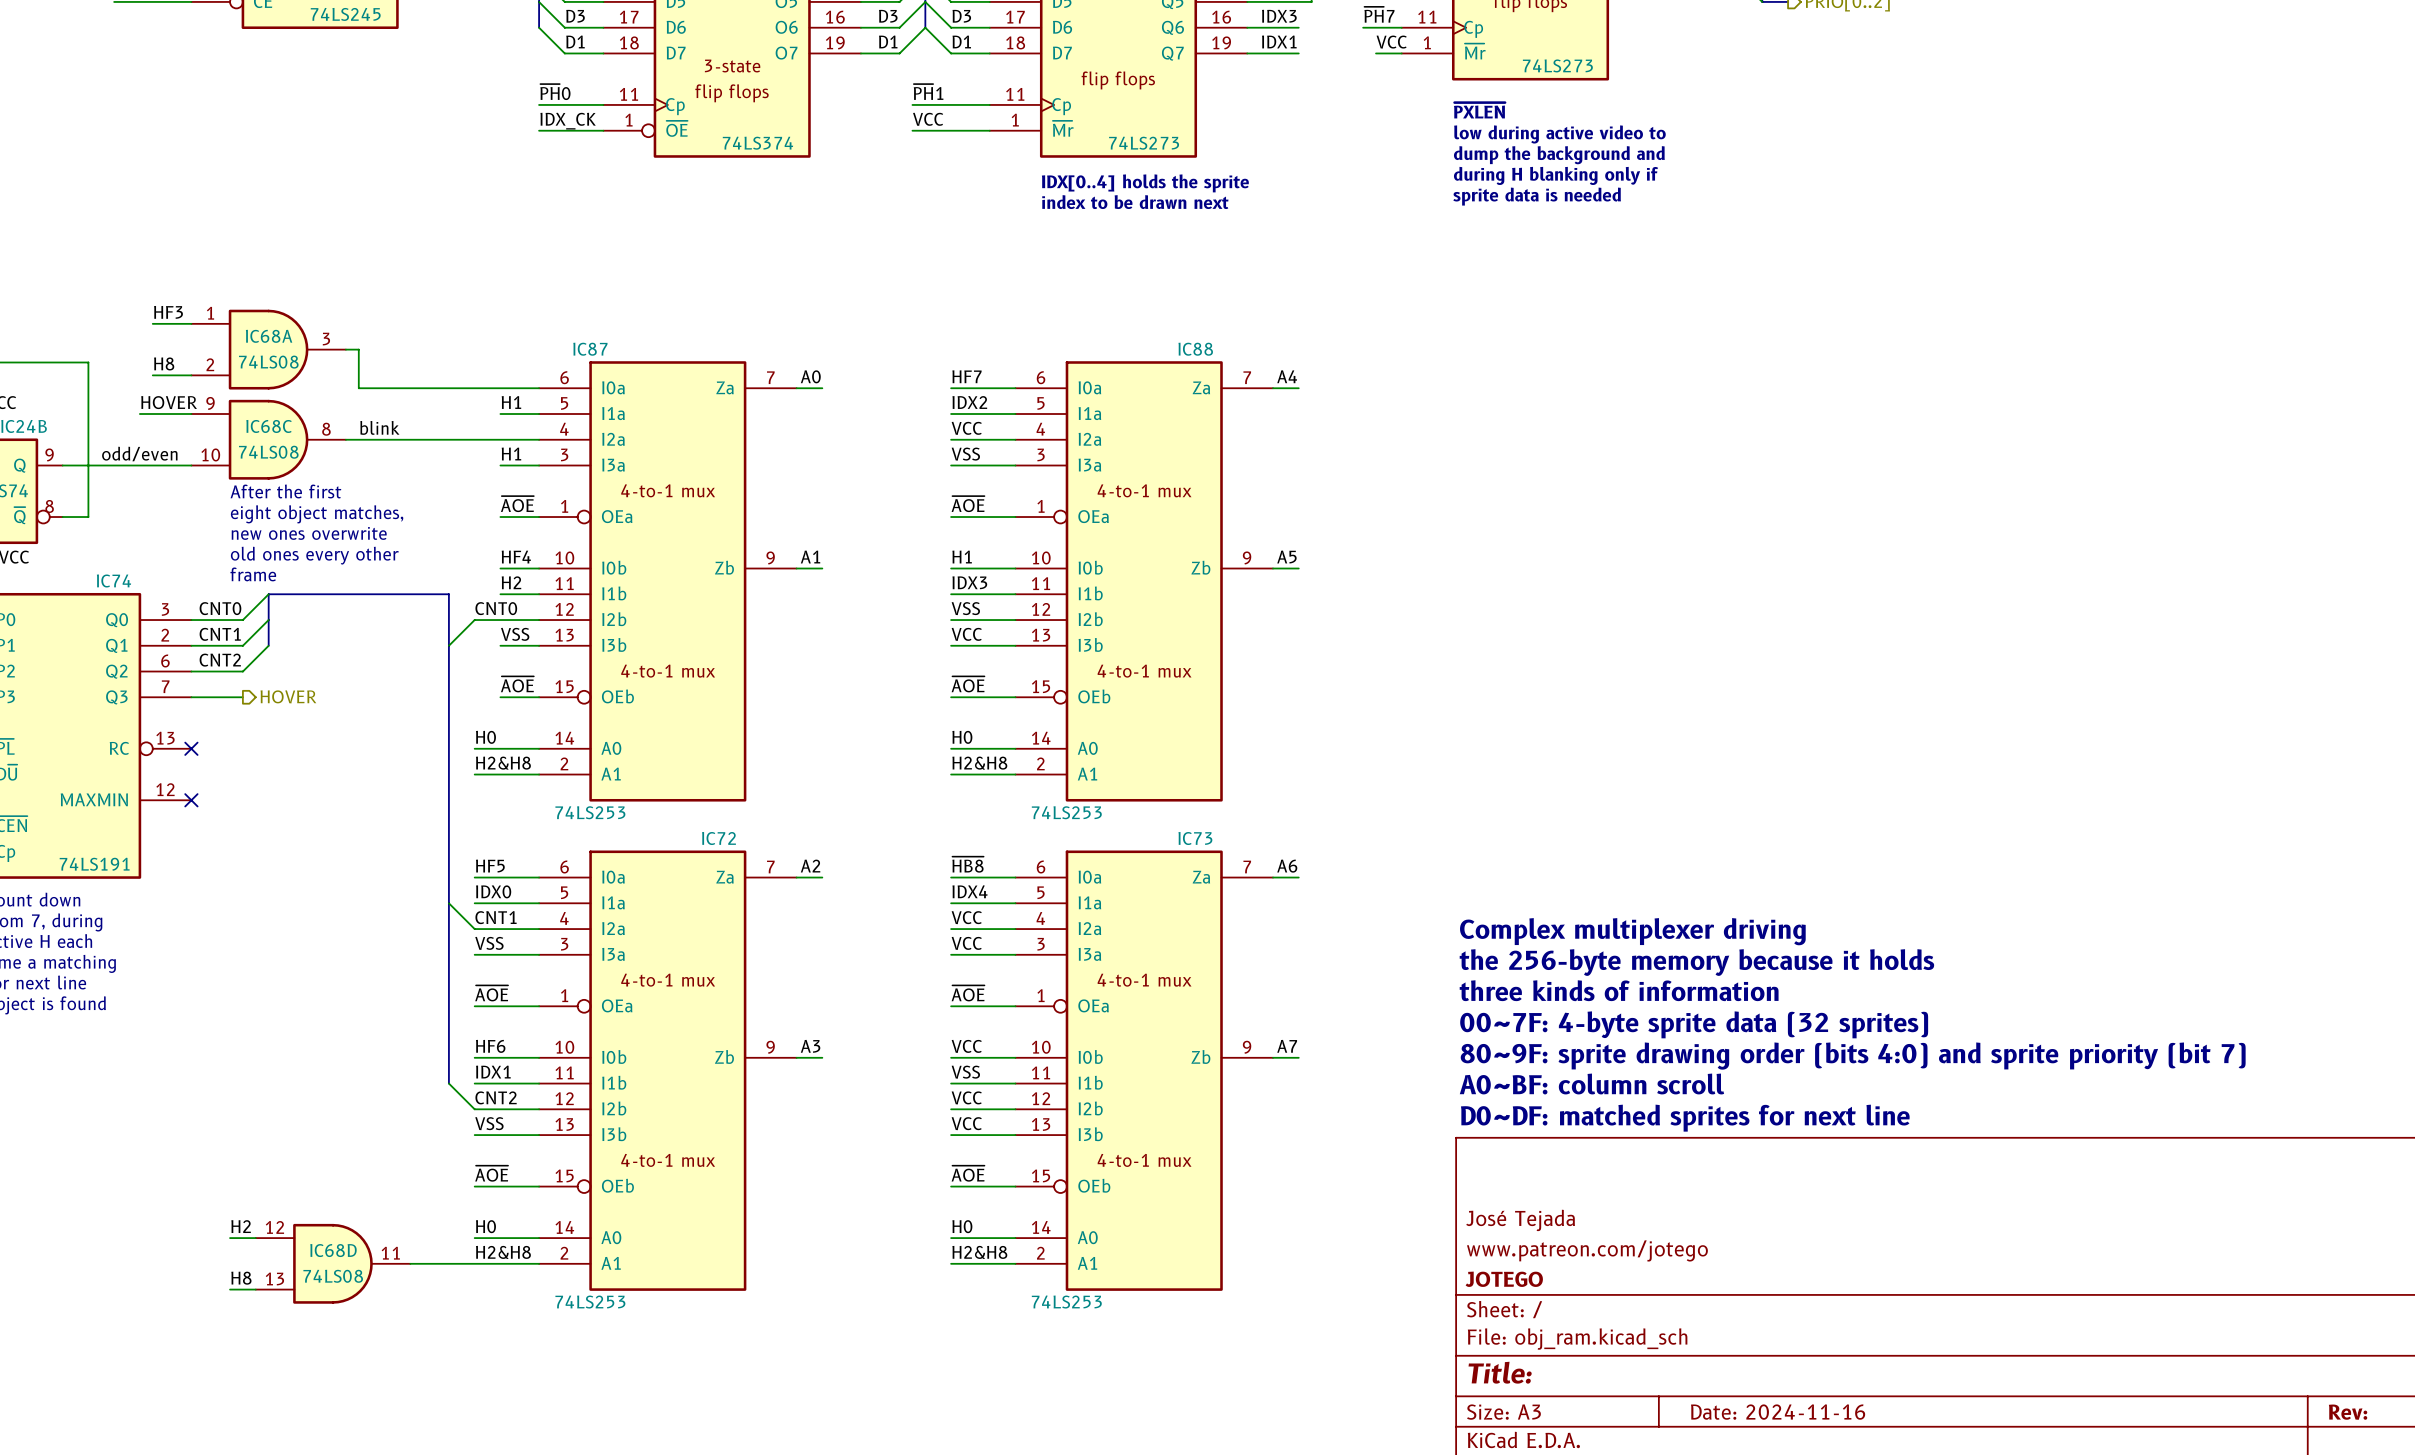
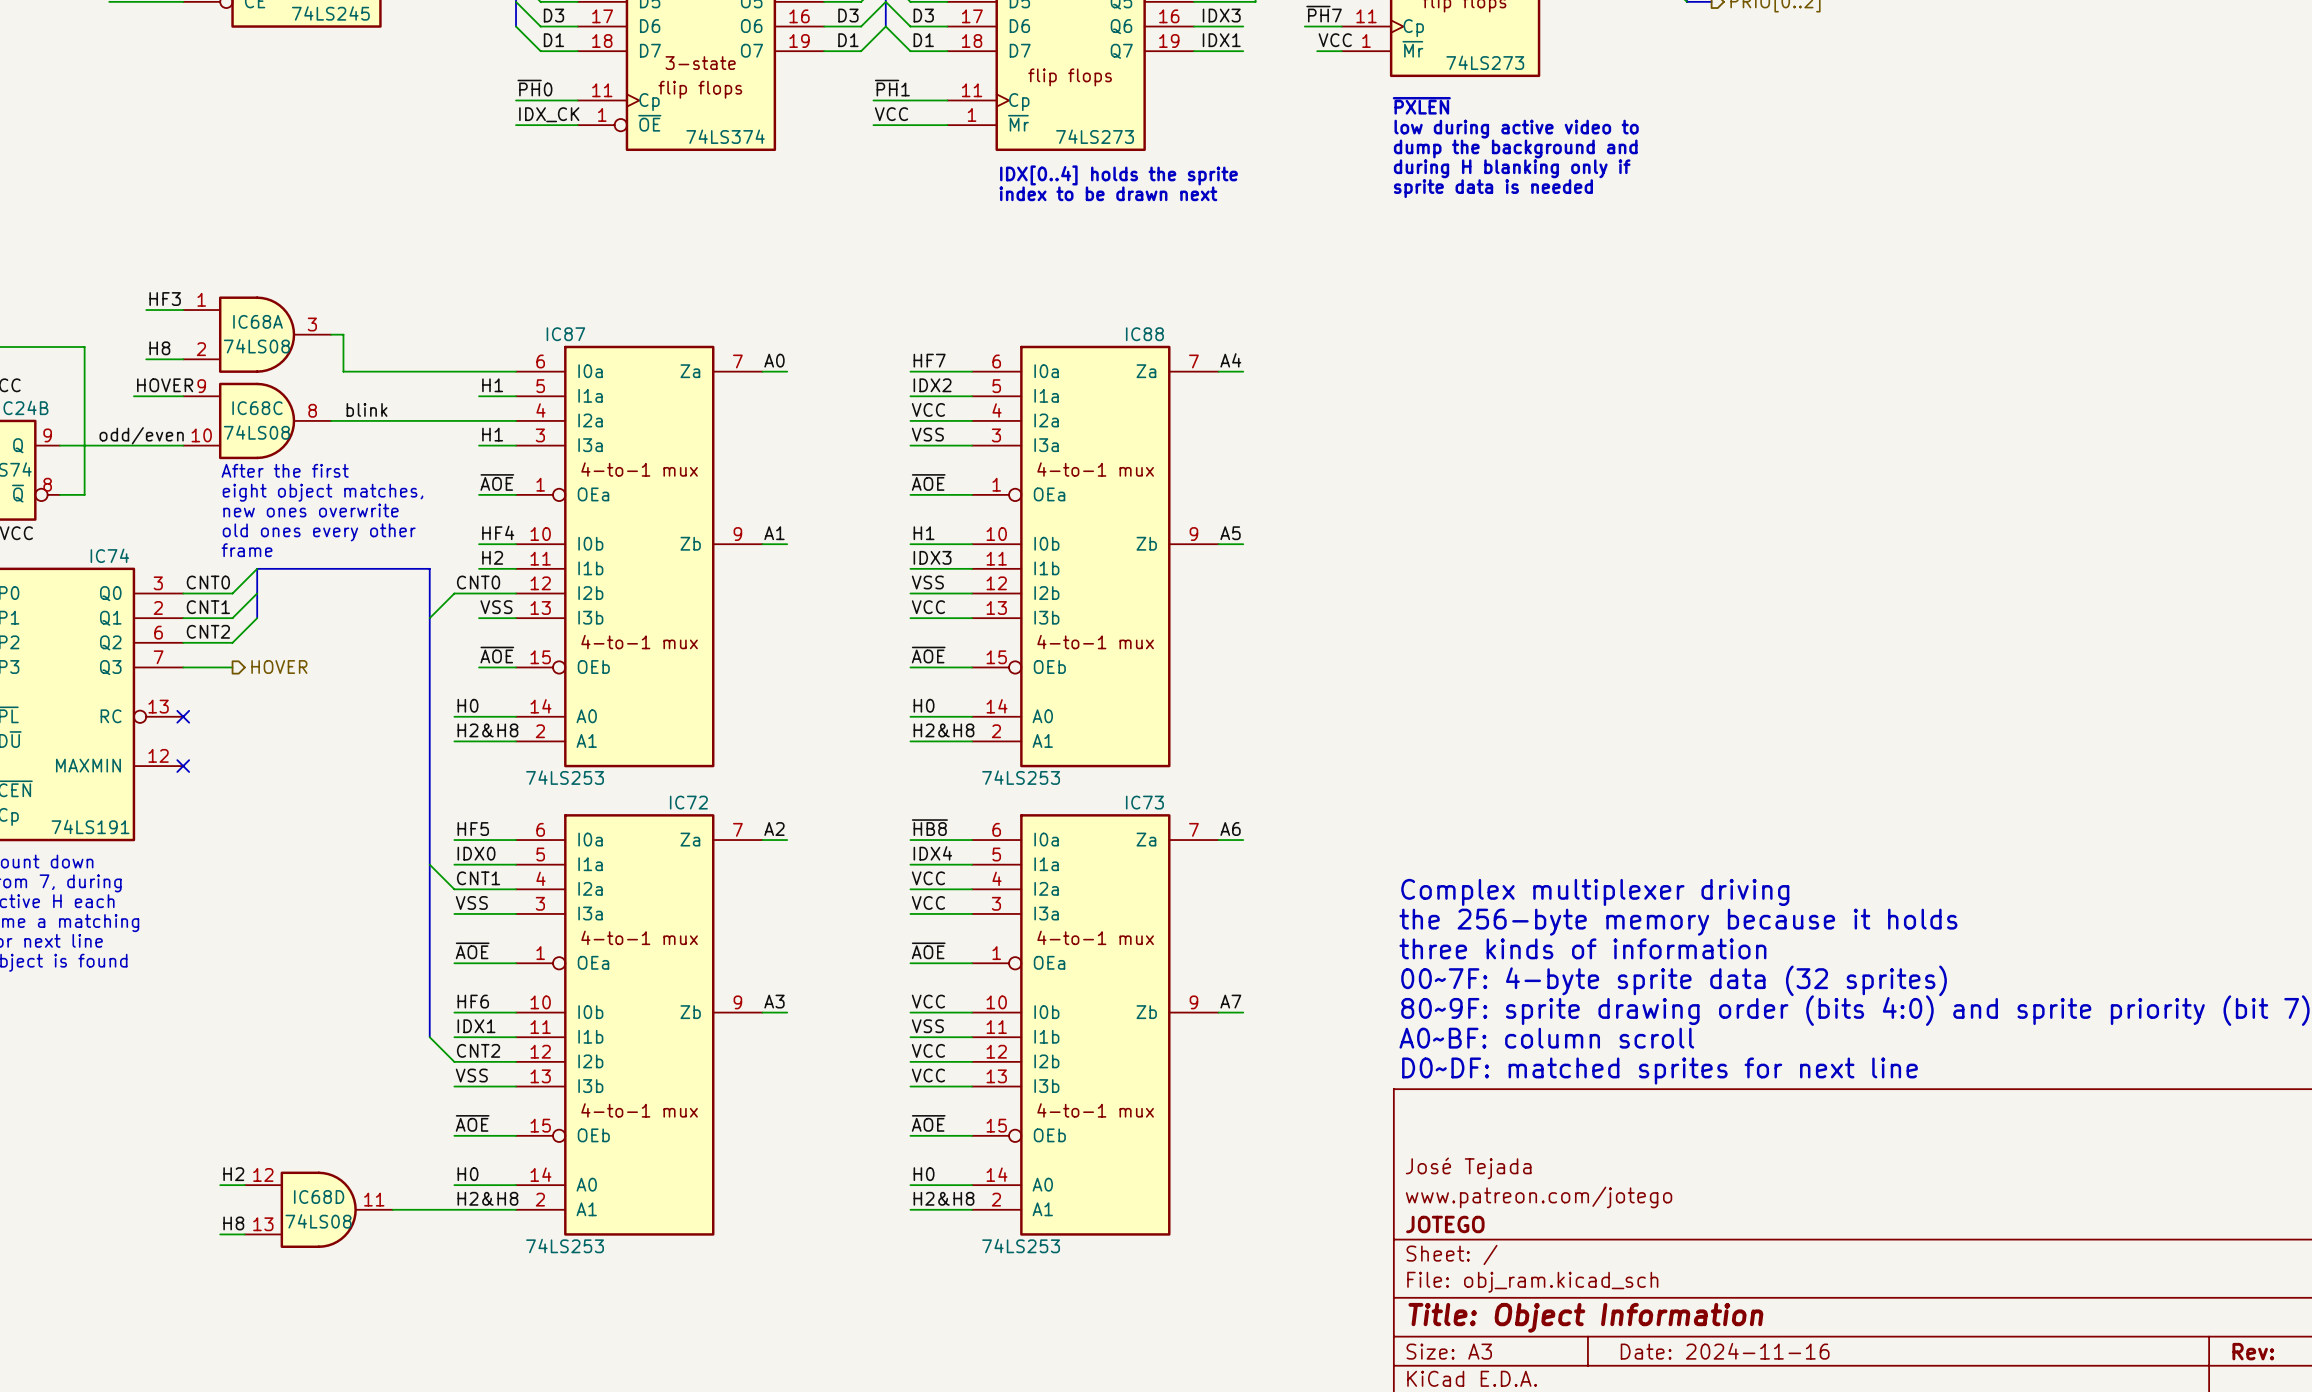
title block: Title: (1500, 1372) -> Title: Object Information (1585, 1317)

